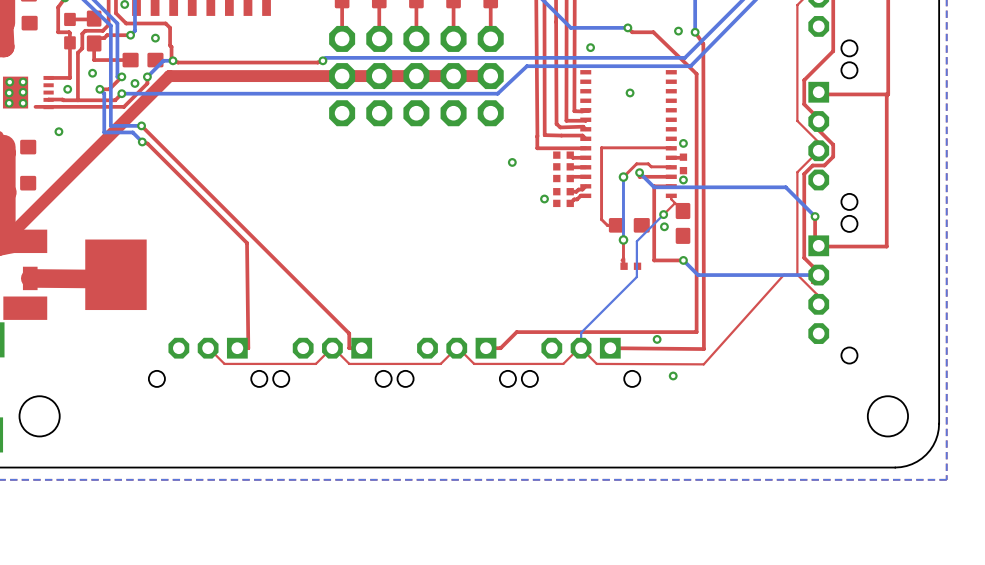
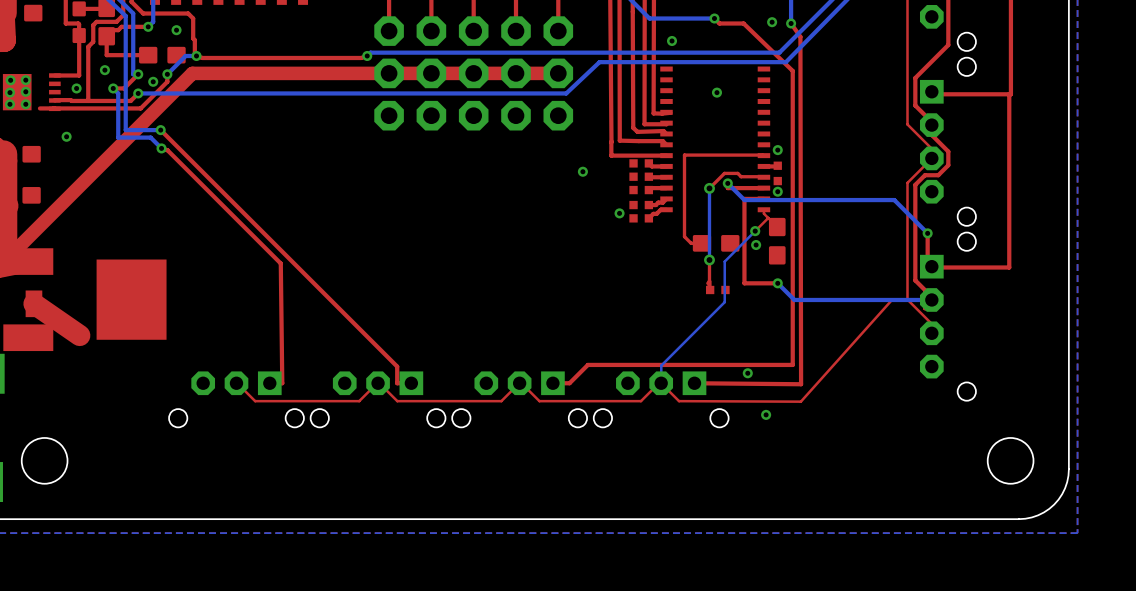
top track: (30, 278) (99, 279) -> (33, 303) (79, 335)

